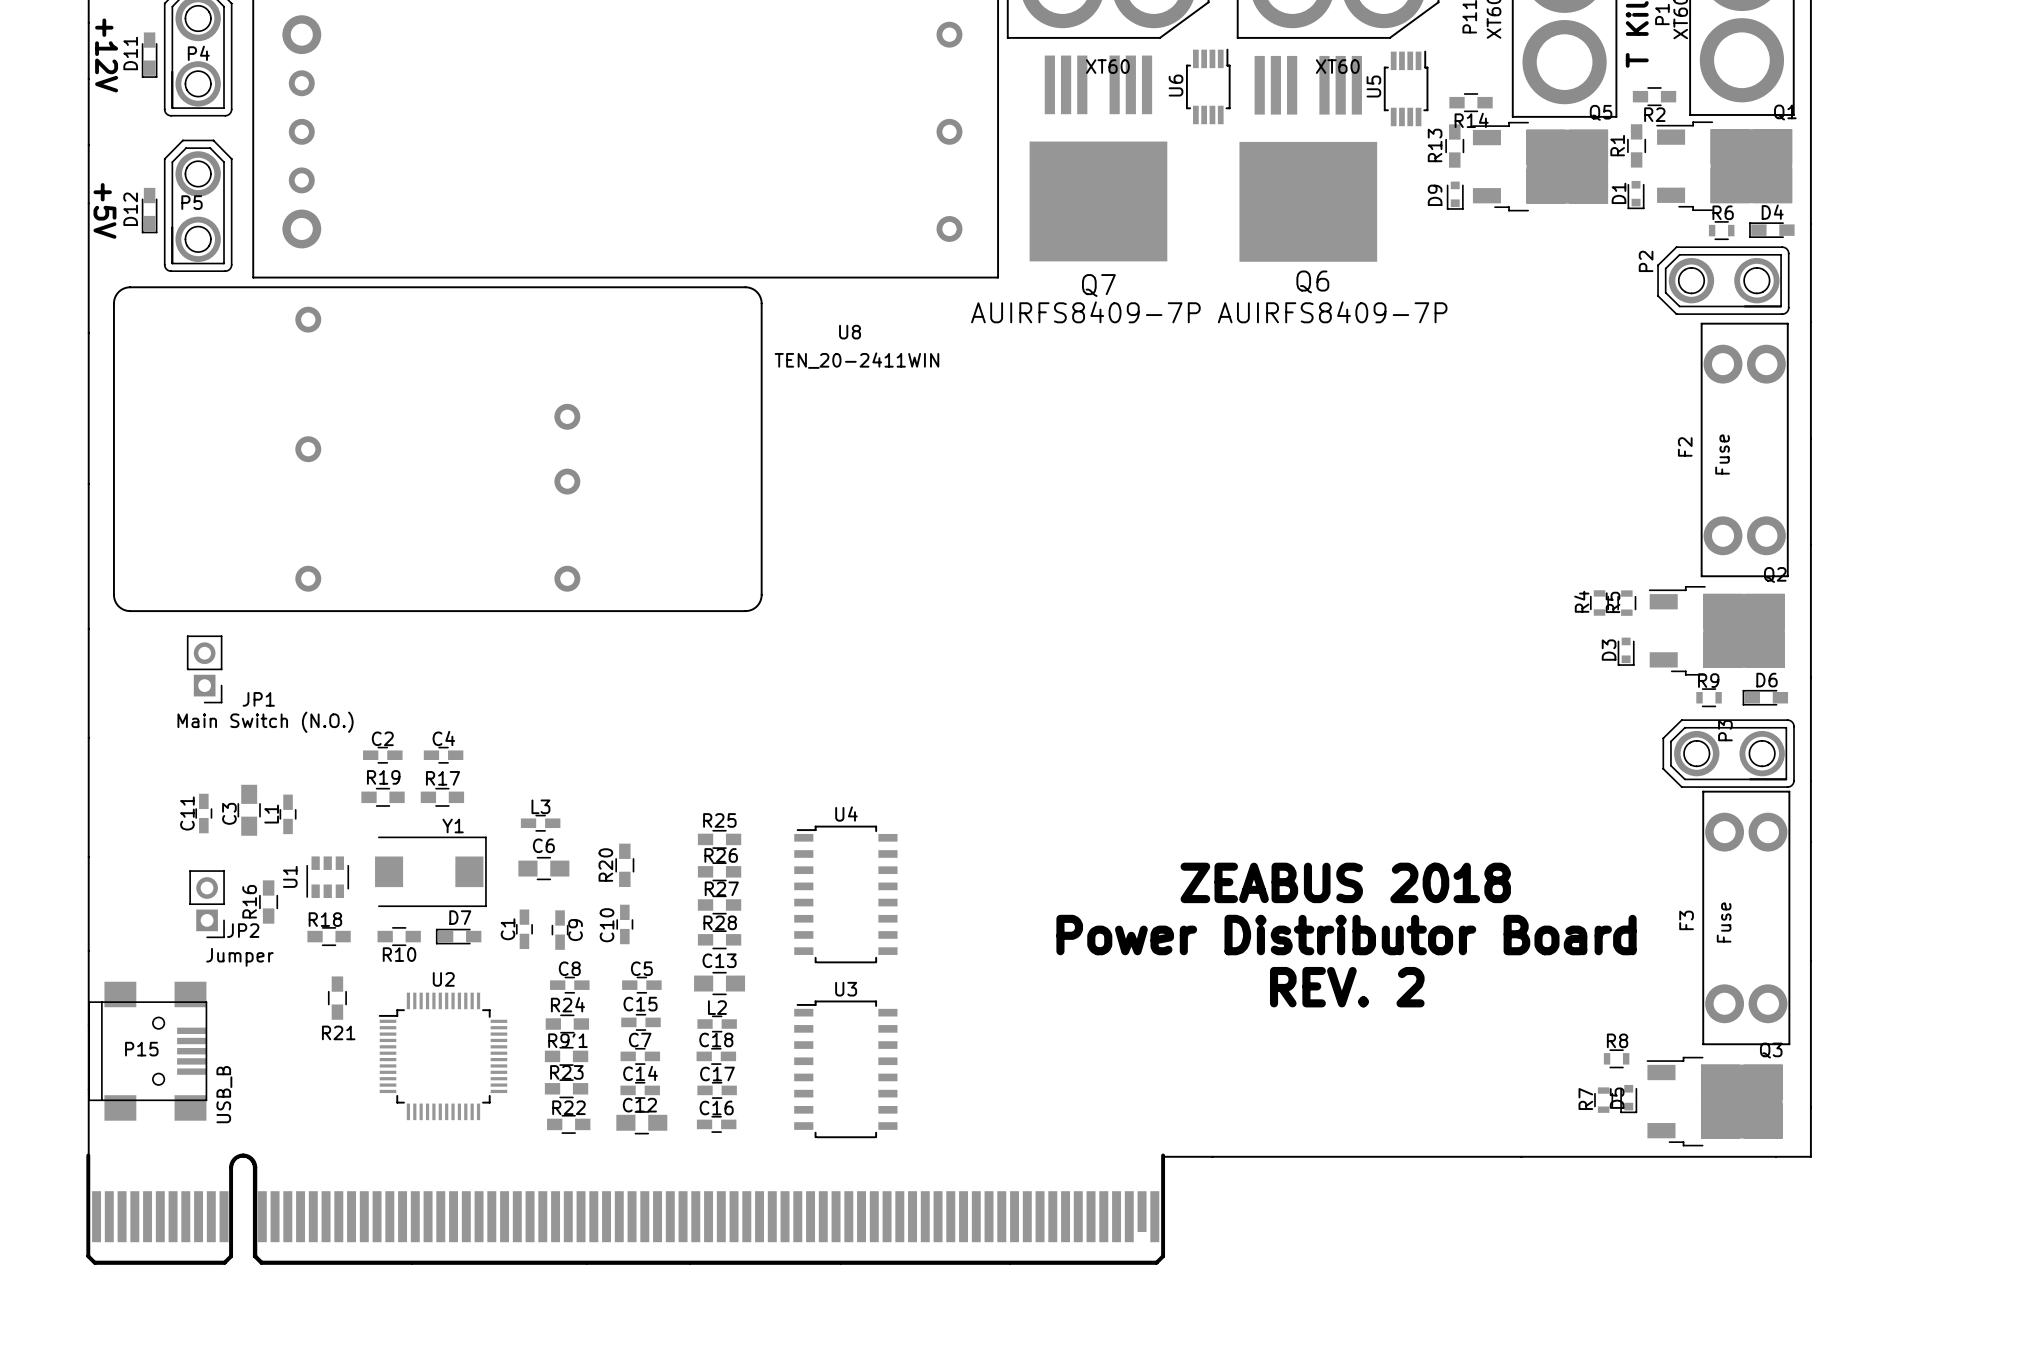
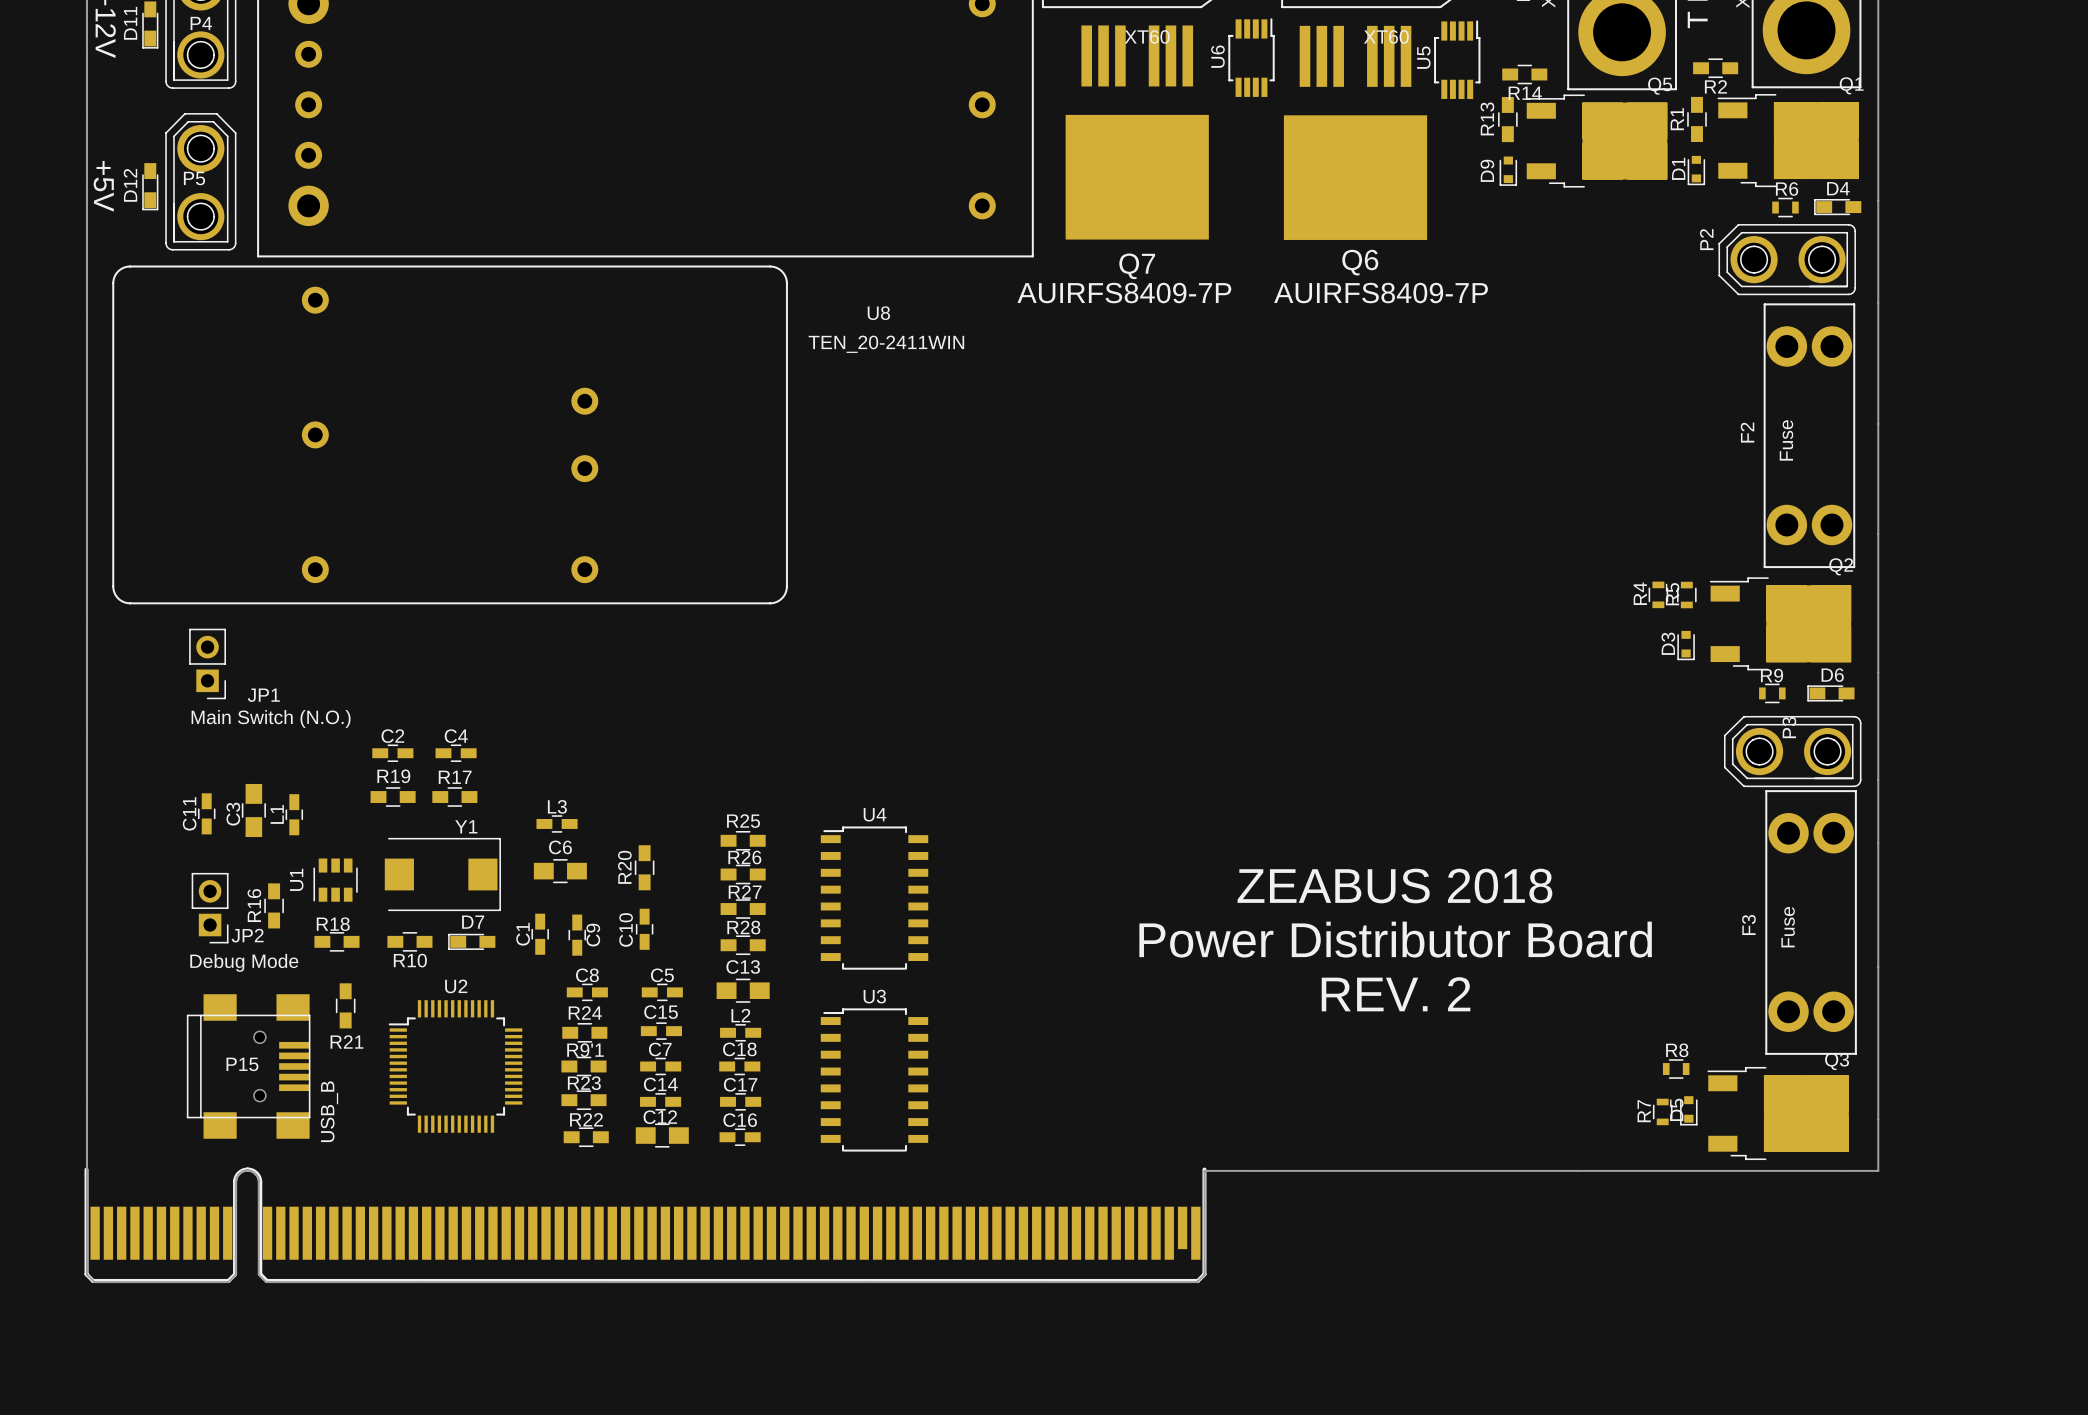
JP2 value: Jumper (239, 957) -> Debug Mode (244, 962)
P15 position: (147, 1051) -> (248, 1066)

